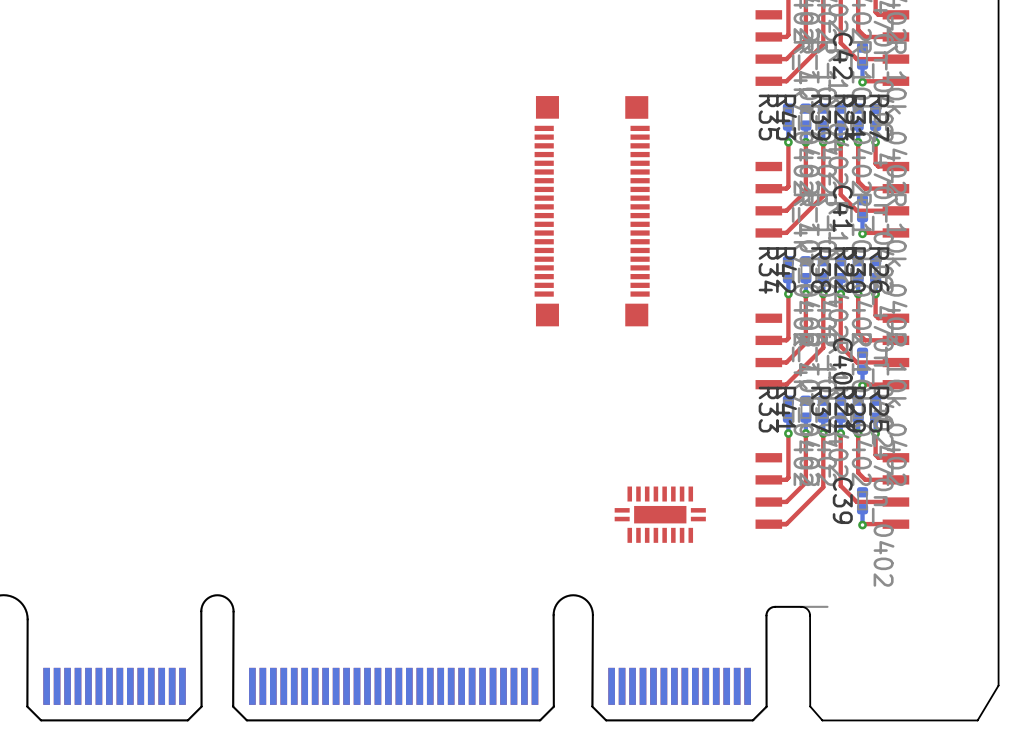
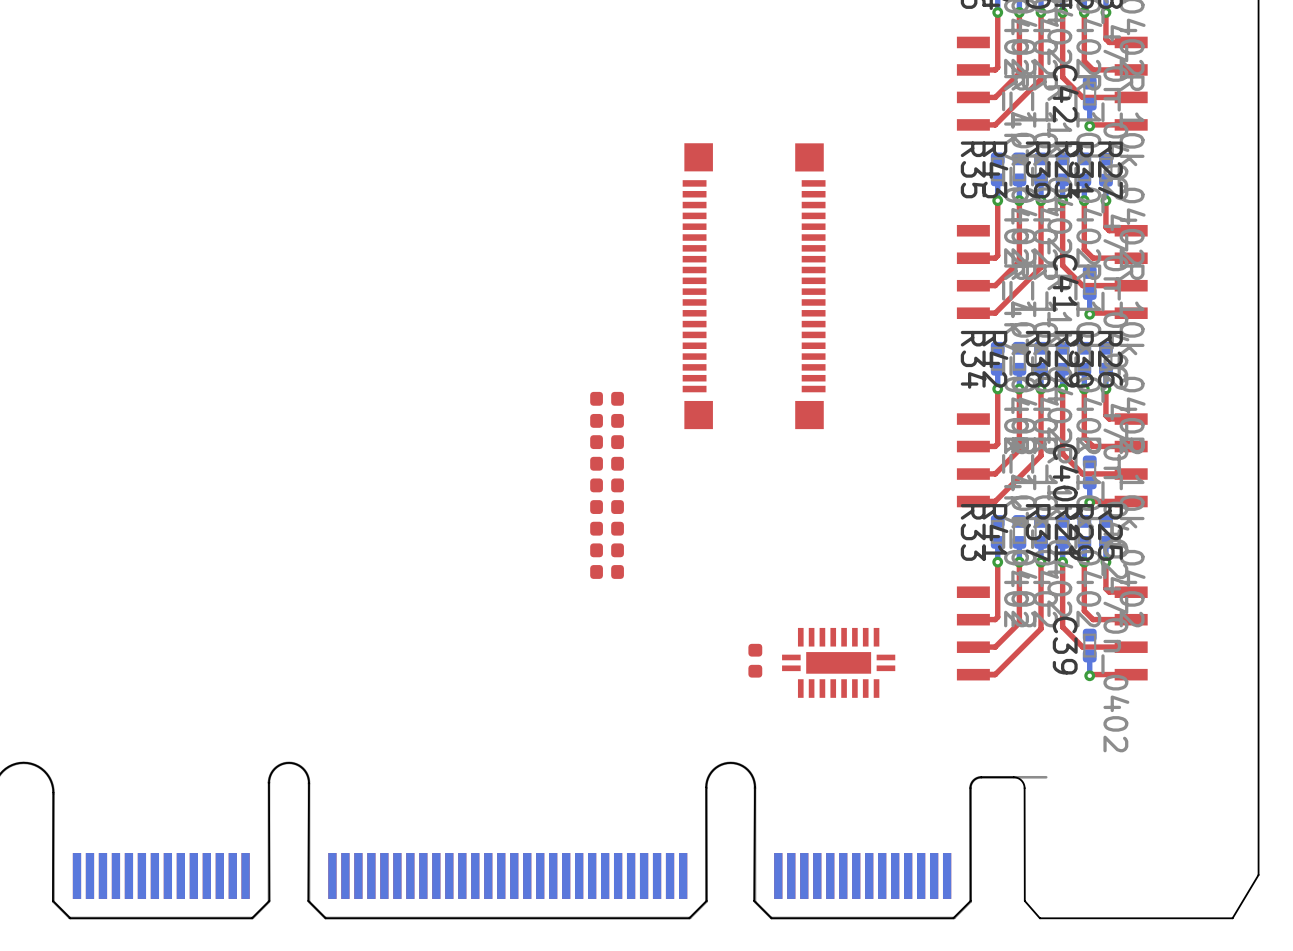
part: none -> (607, 398)
part: none -> (607, 420)
part: none -> (607, 442)
part: none -> (607, 463)
part: none -> (607, 485)
part: none -> (607, 507)
part: none -> (607, 528)
part: none -> (607, 550)
part: none -> (607, 571)
part: none -> (755, 660)

